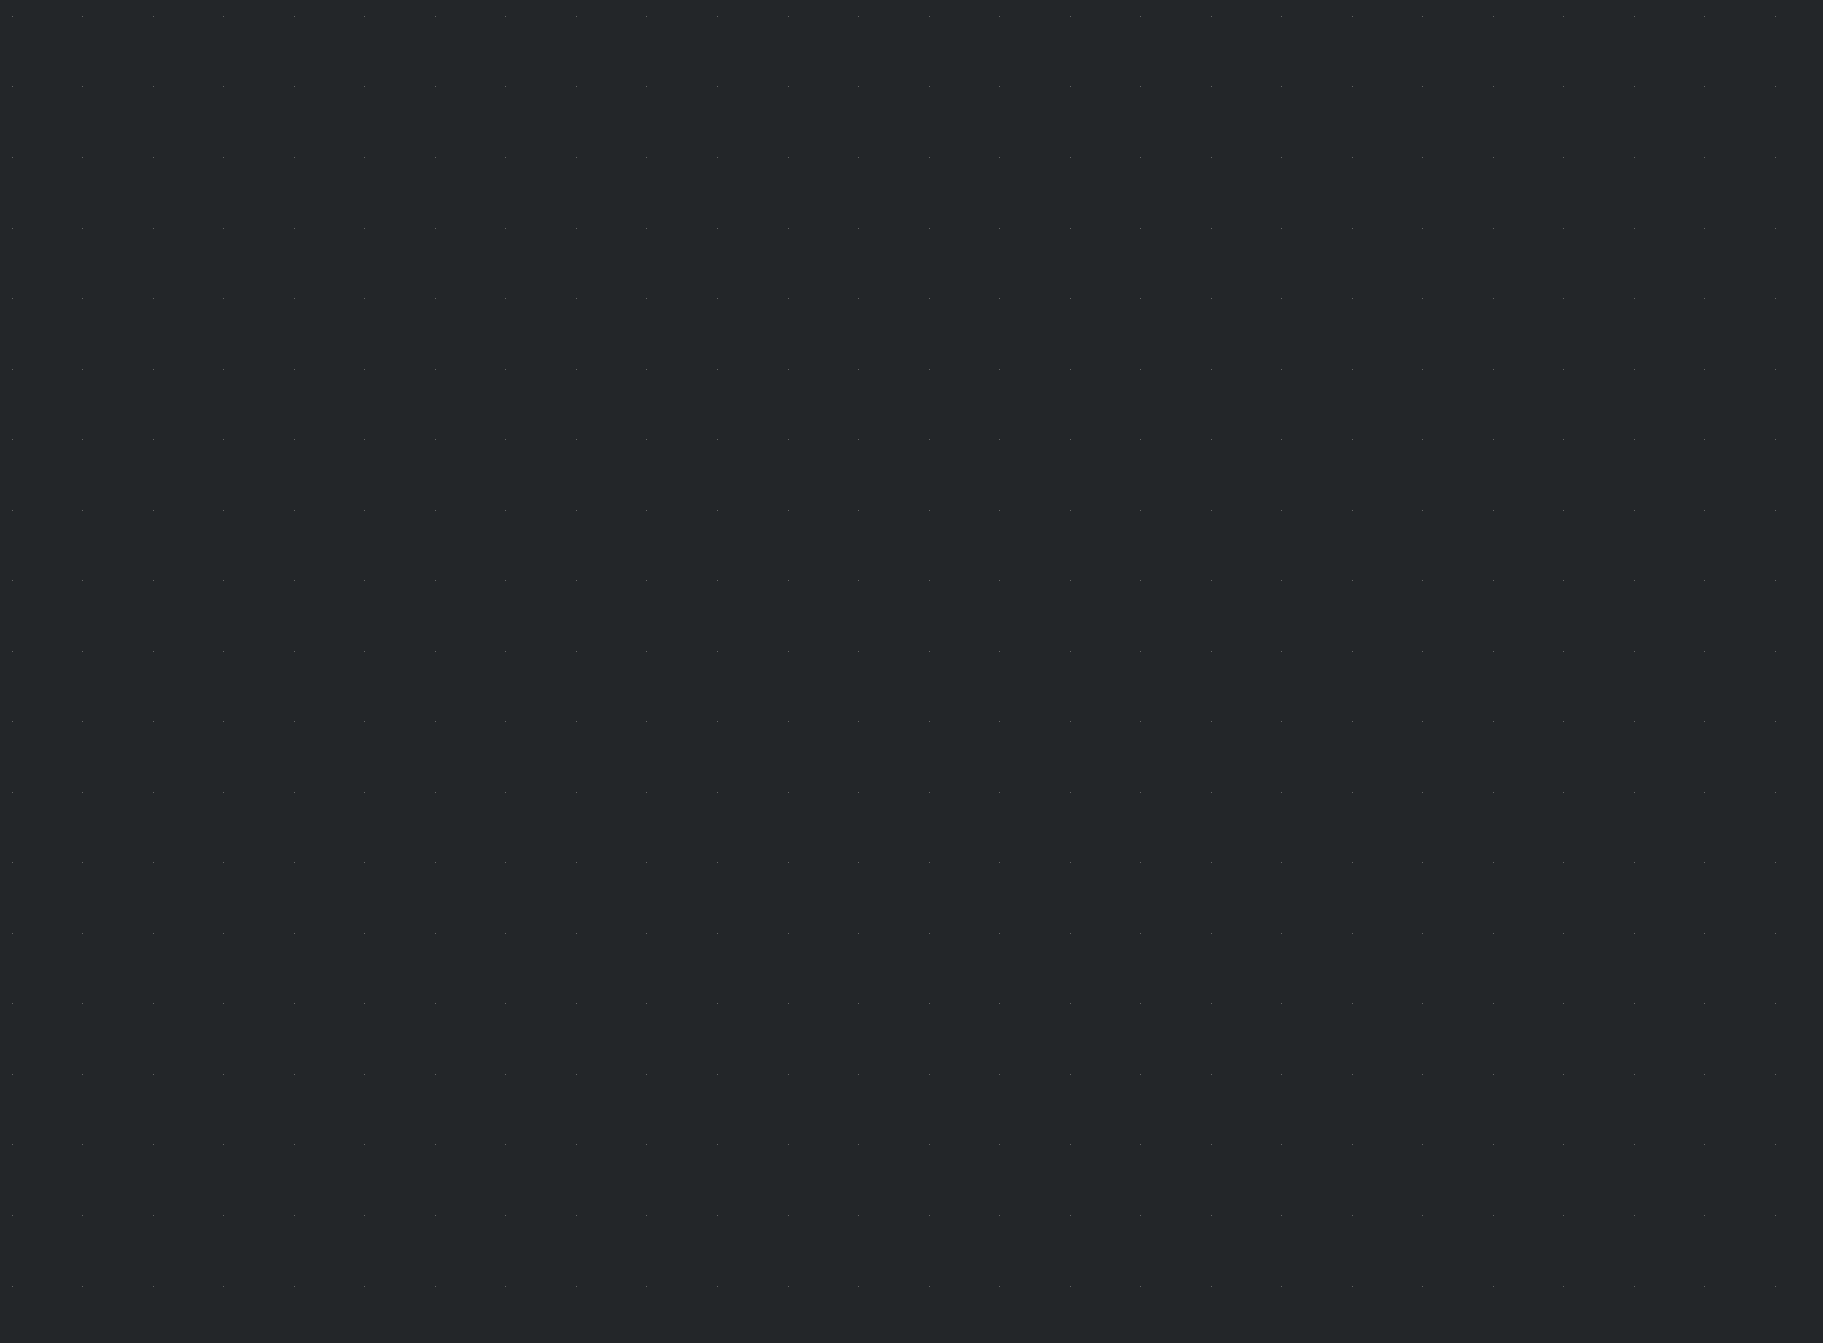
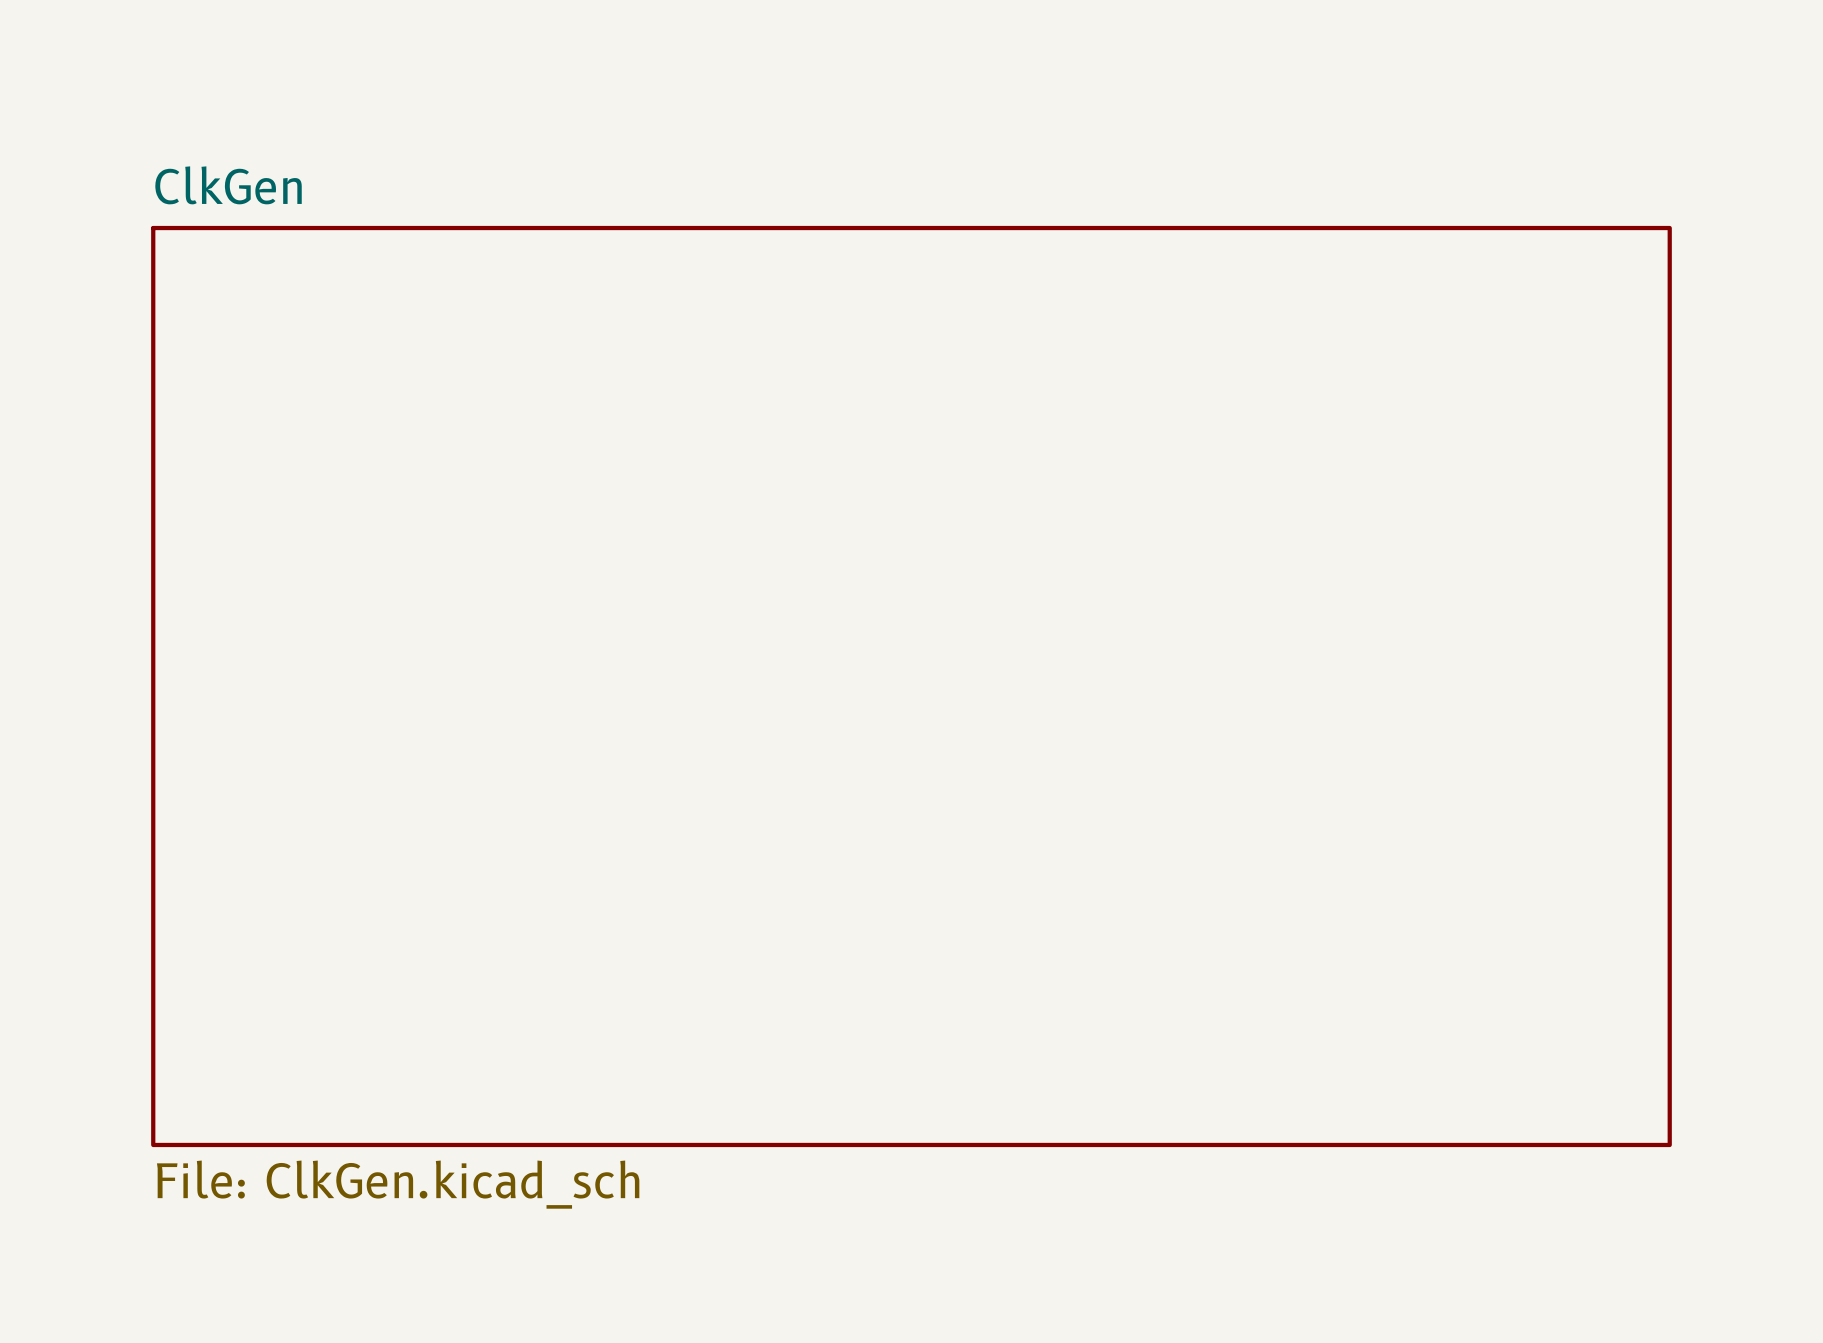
sheet ClkGen: none -> File: ClkGen.kicad_sch (911, 686)

